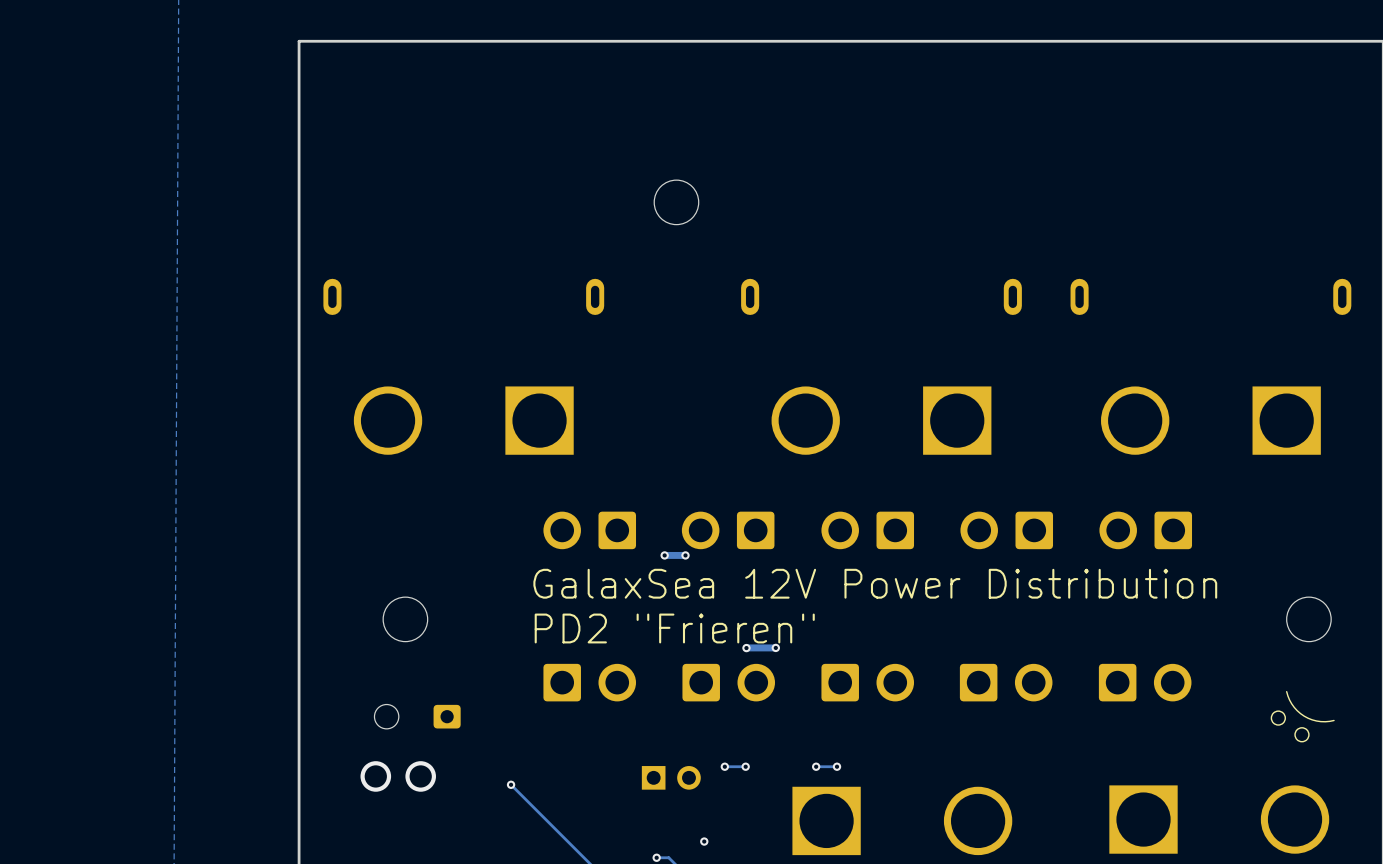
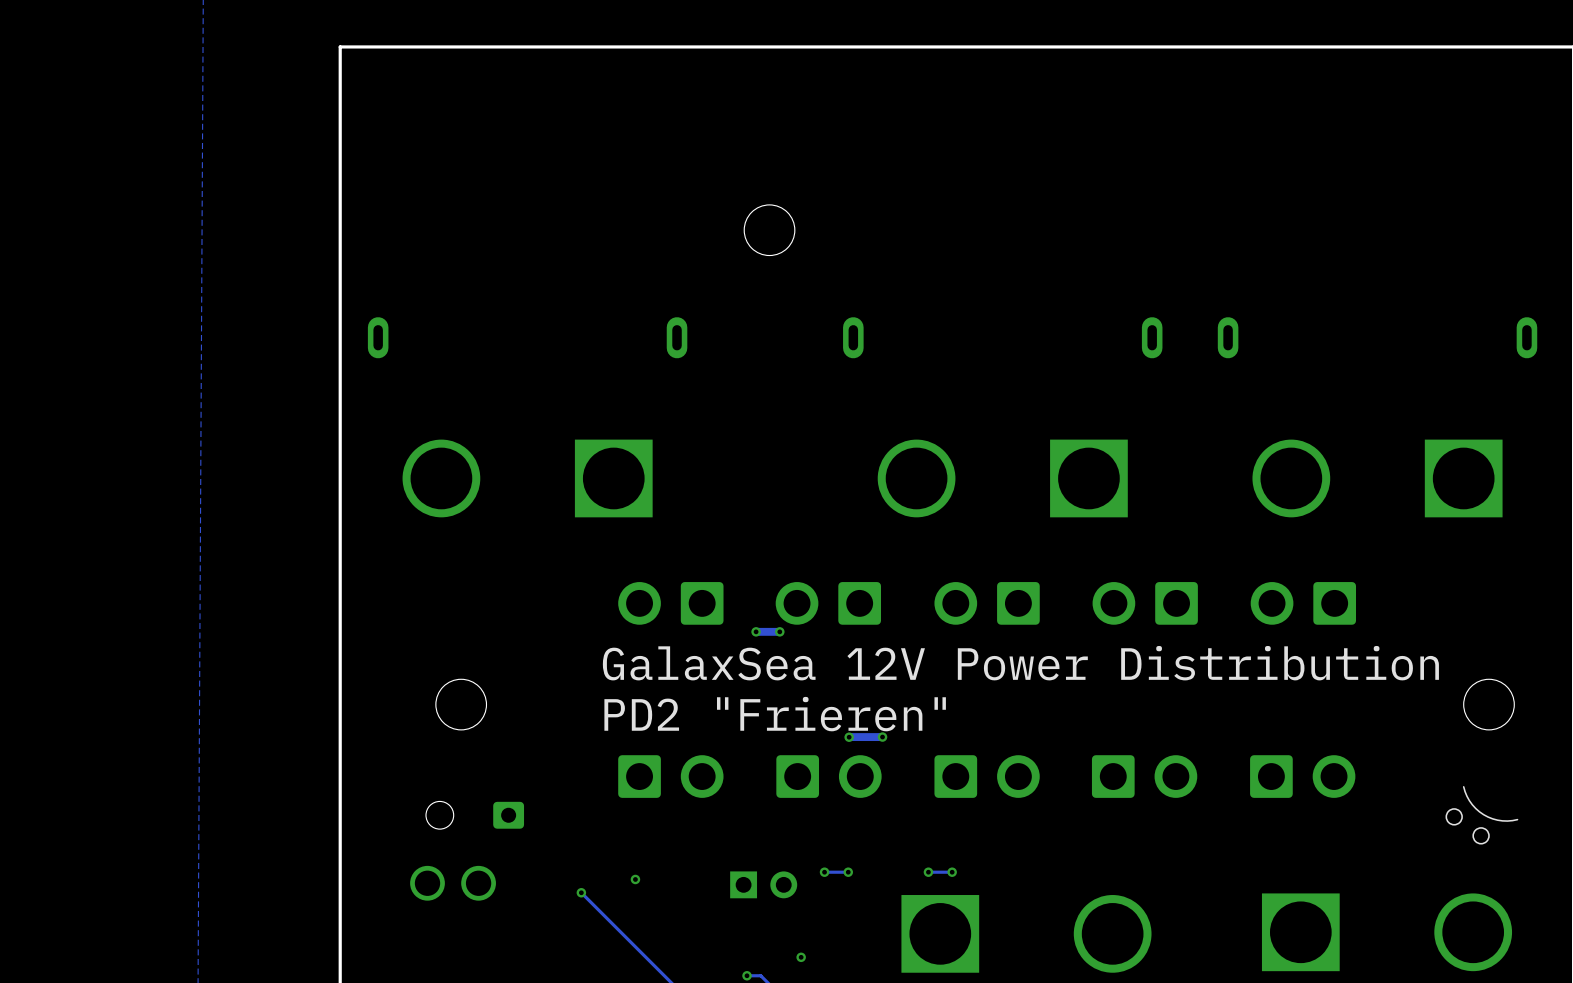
via: none -> (635, 879)

